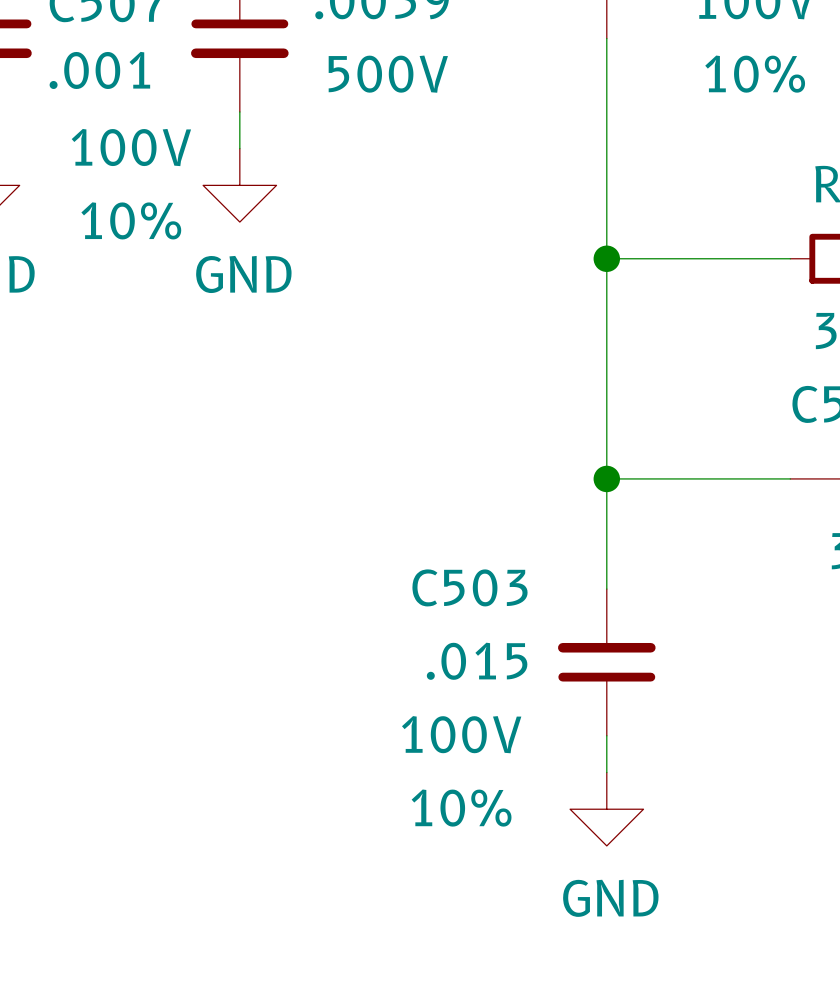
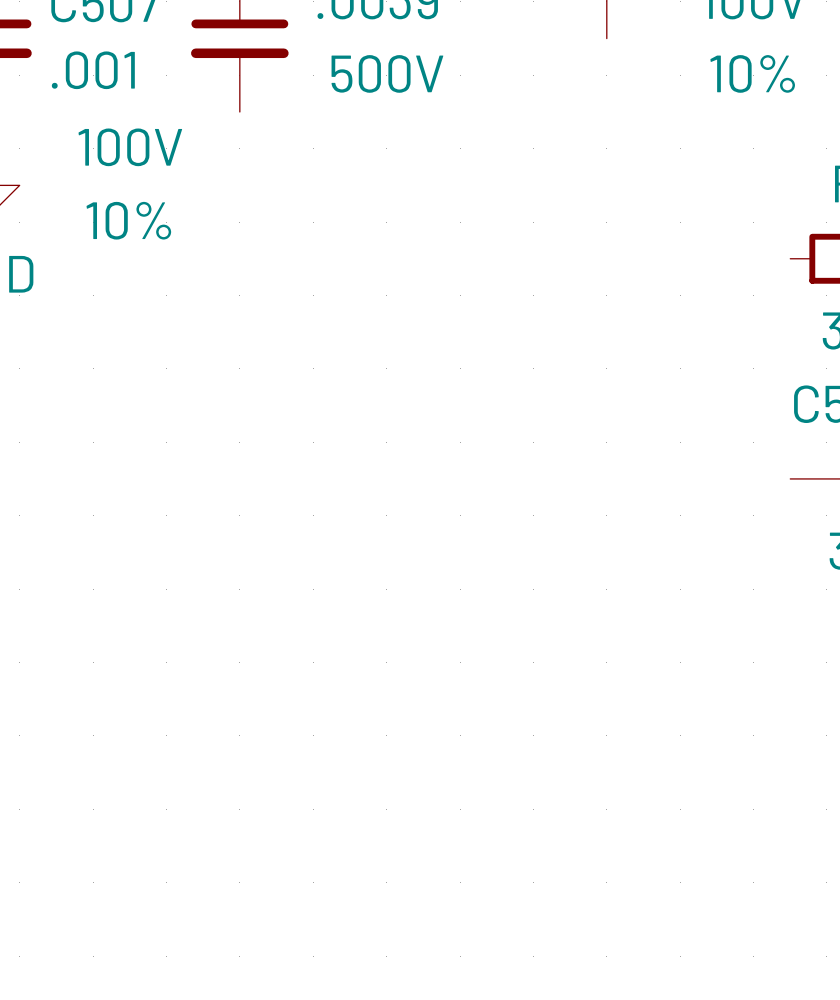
wire: (606, 38) (606, 589) -> none
wire: (239, 111) (239, 148) -> none
power symbol: GND (239, 185) -> none
wire: (606, 258) (790, 258) -> none
junction: (606, 258) -> none
wire: (606, 478) (790, 478) -> none
junction: (606, 478) -> none
C503: .015 (606, 662) -> none
wire: (606, 735) (606, 772) -> none
power symbol: GND (606, 809) -> none

